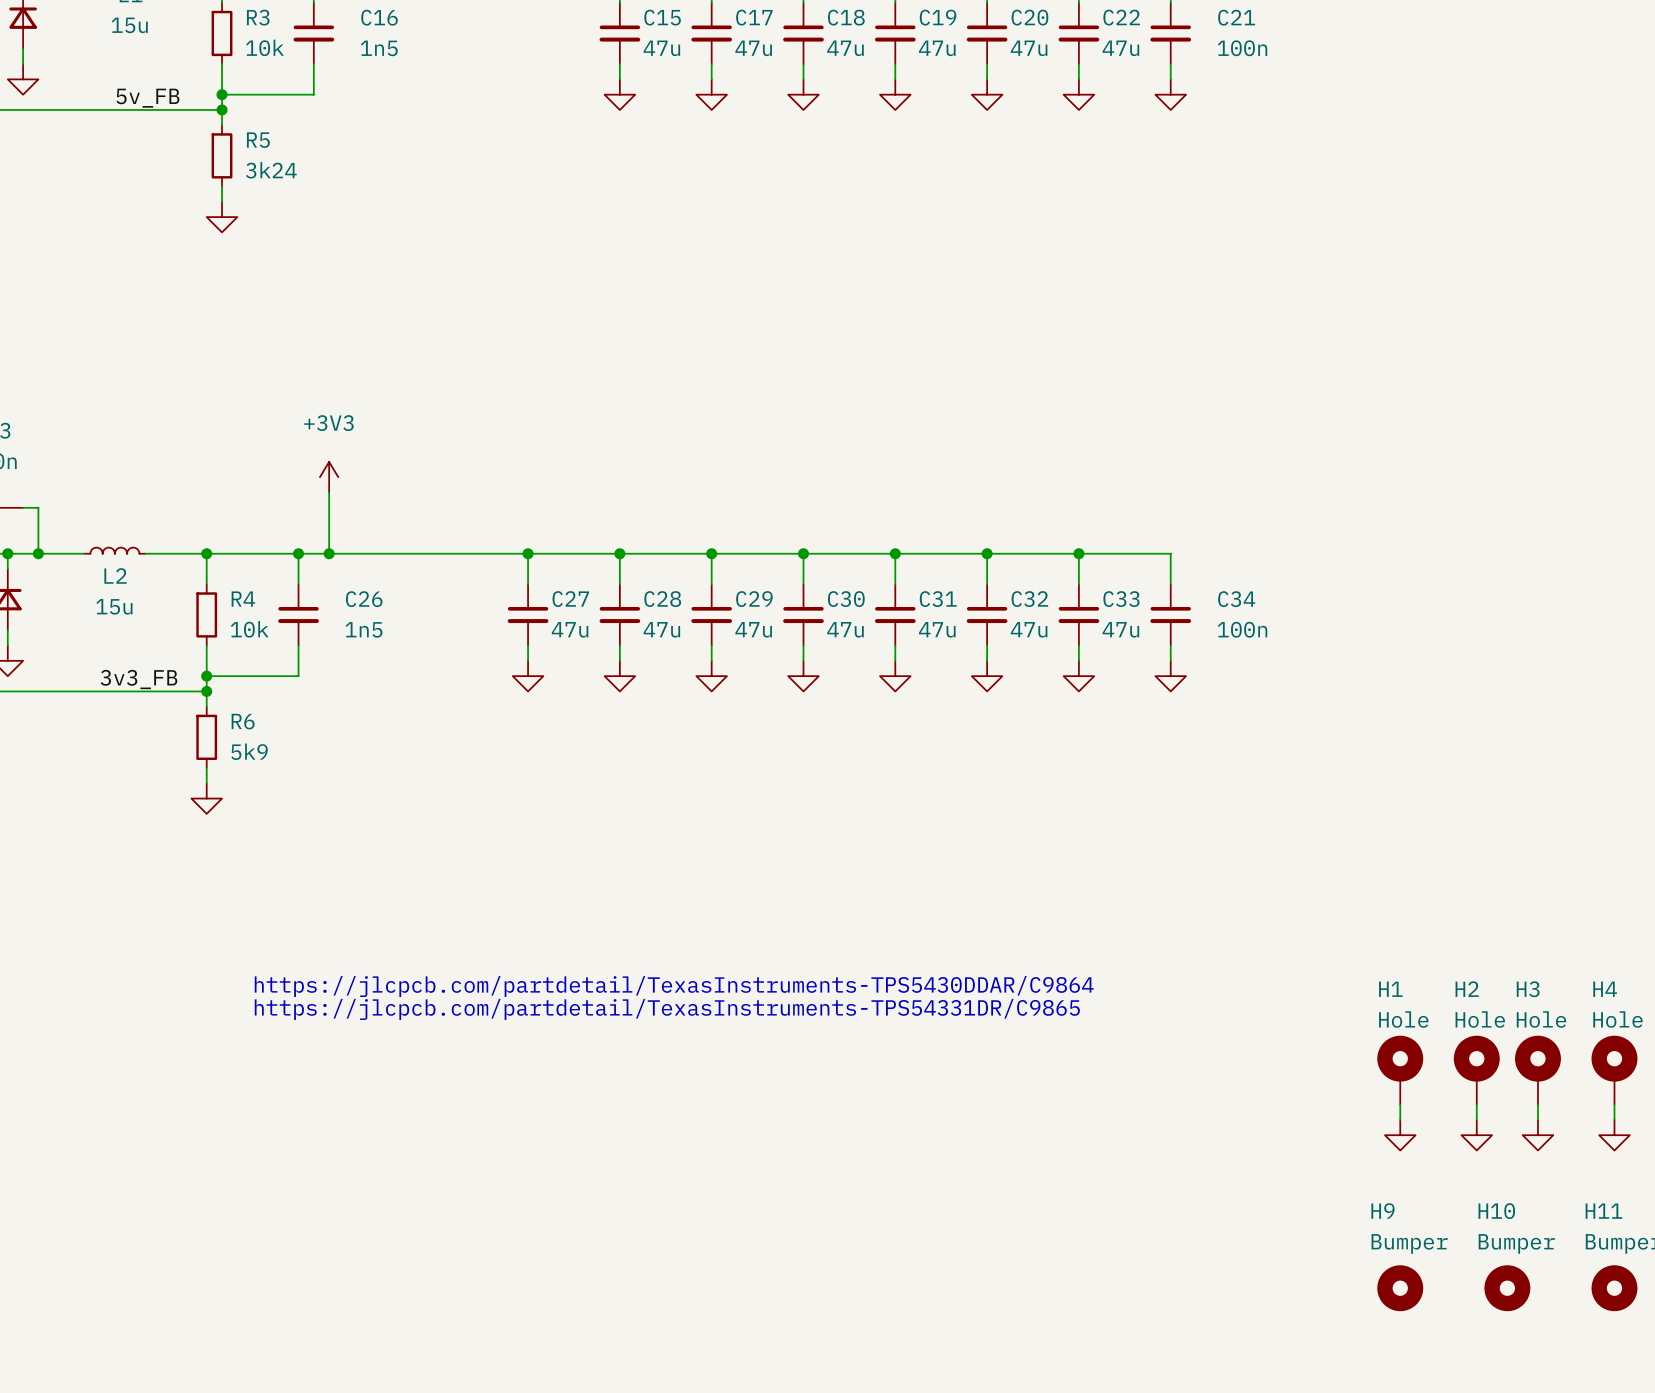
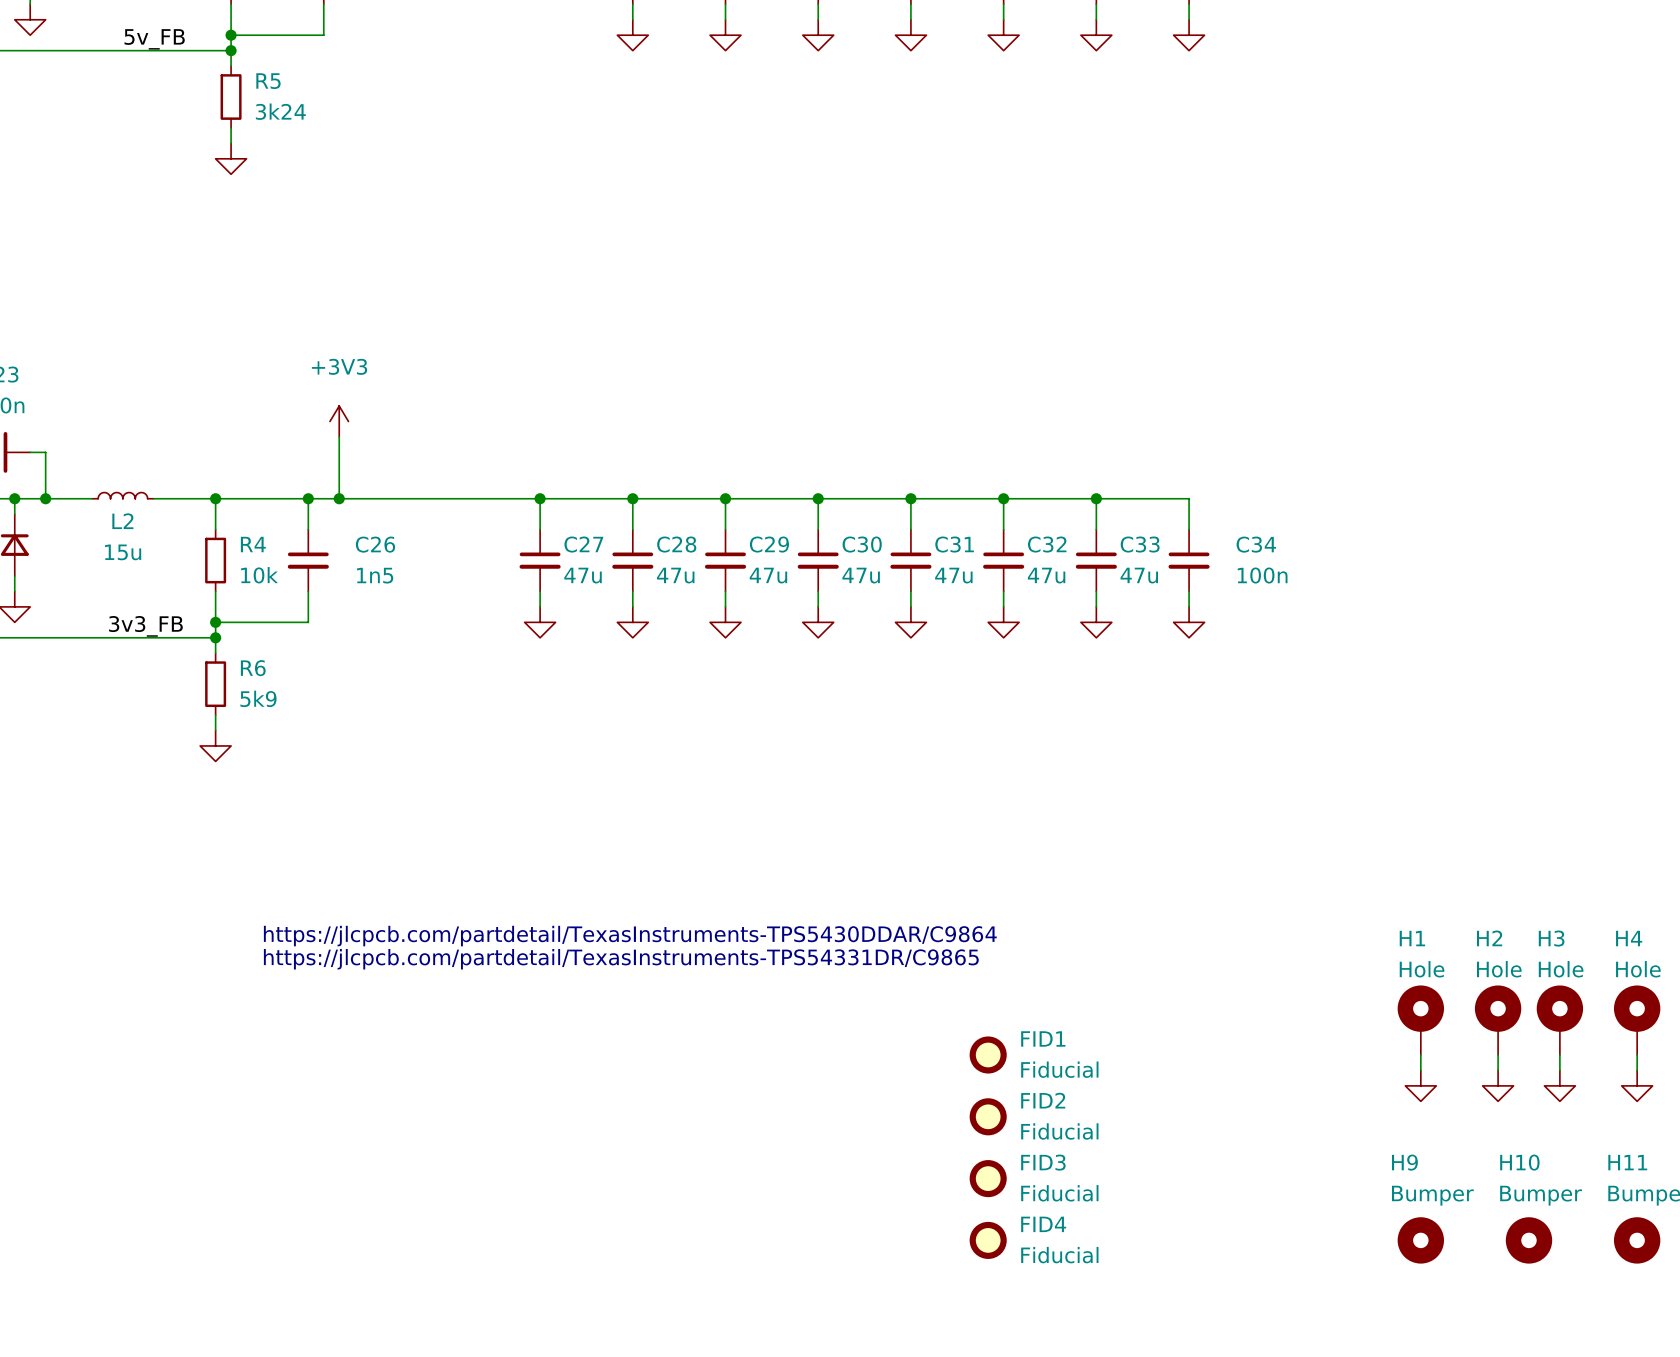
FID1: none -> Fiducial (988, 1055)
FID2: none -> Fiducial (988, 1116)
FID3: none -> Fiducial (988, 1178)
FID4: none -> Fiducial (988, 1240)

